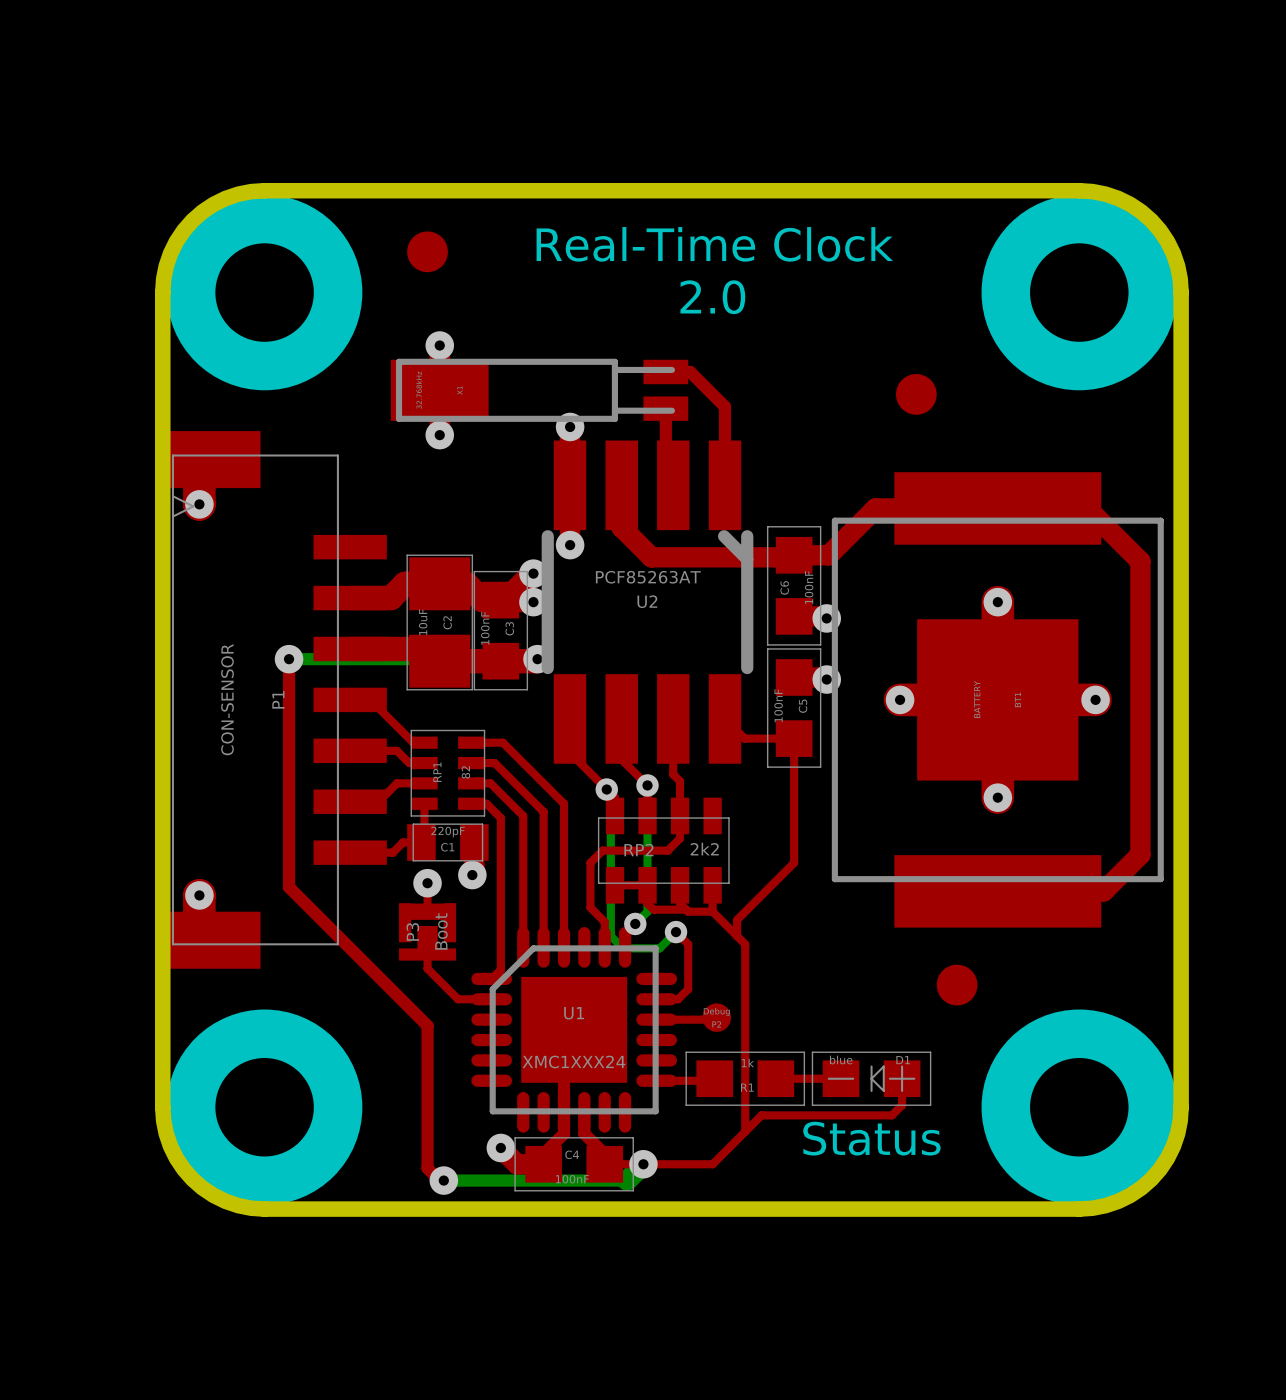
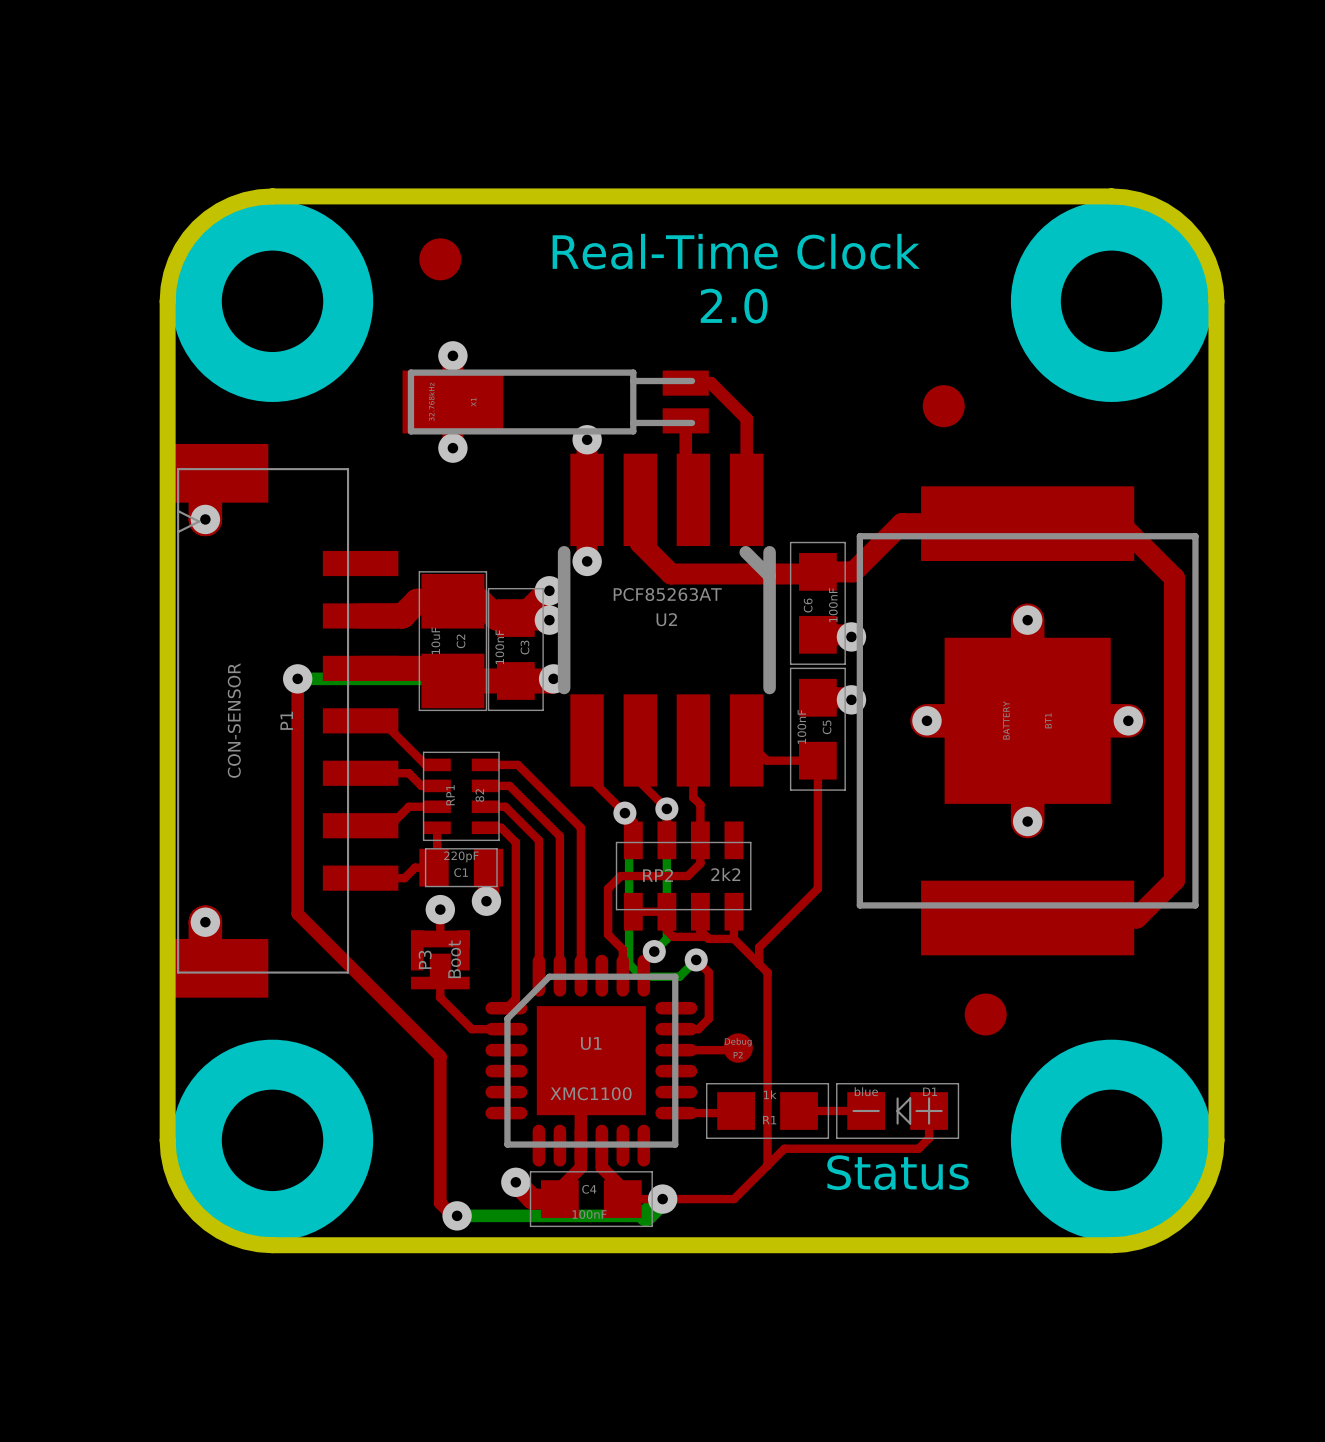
U1 value: XMC1XXX24 (573, 1061) -> XMC1100 (591, 1093)

